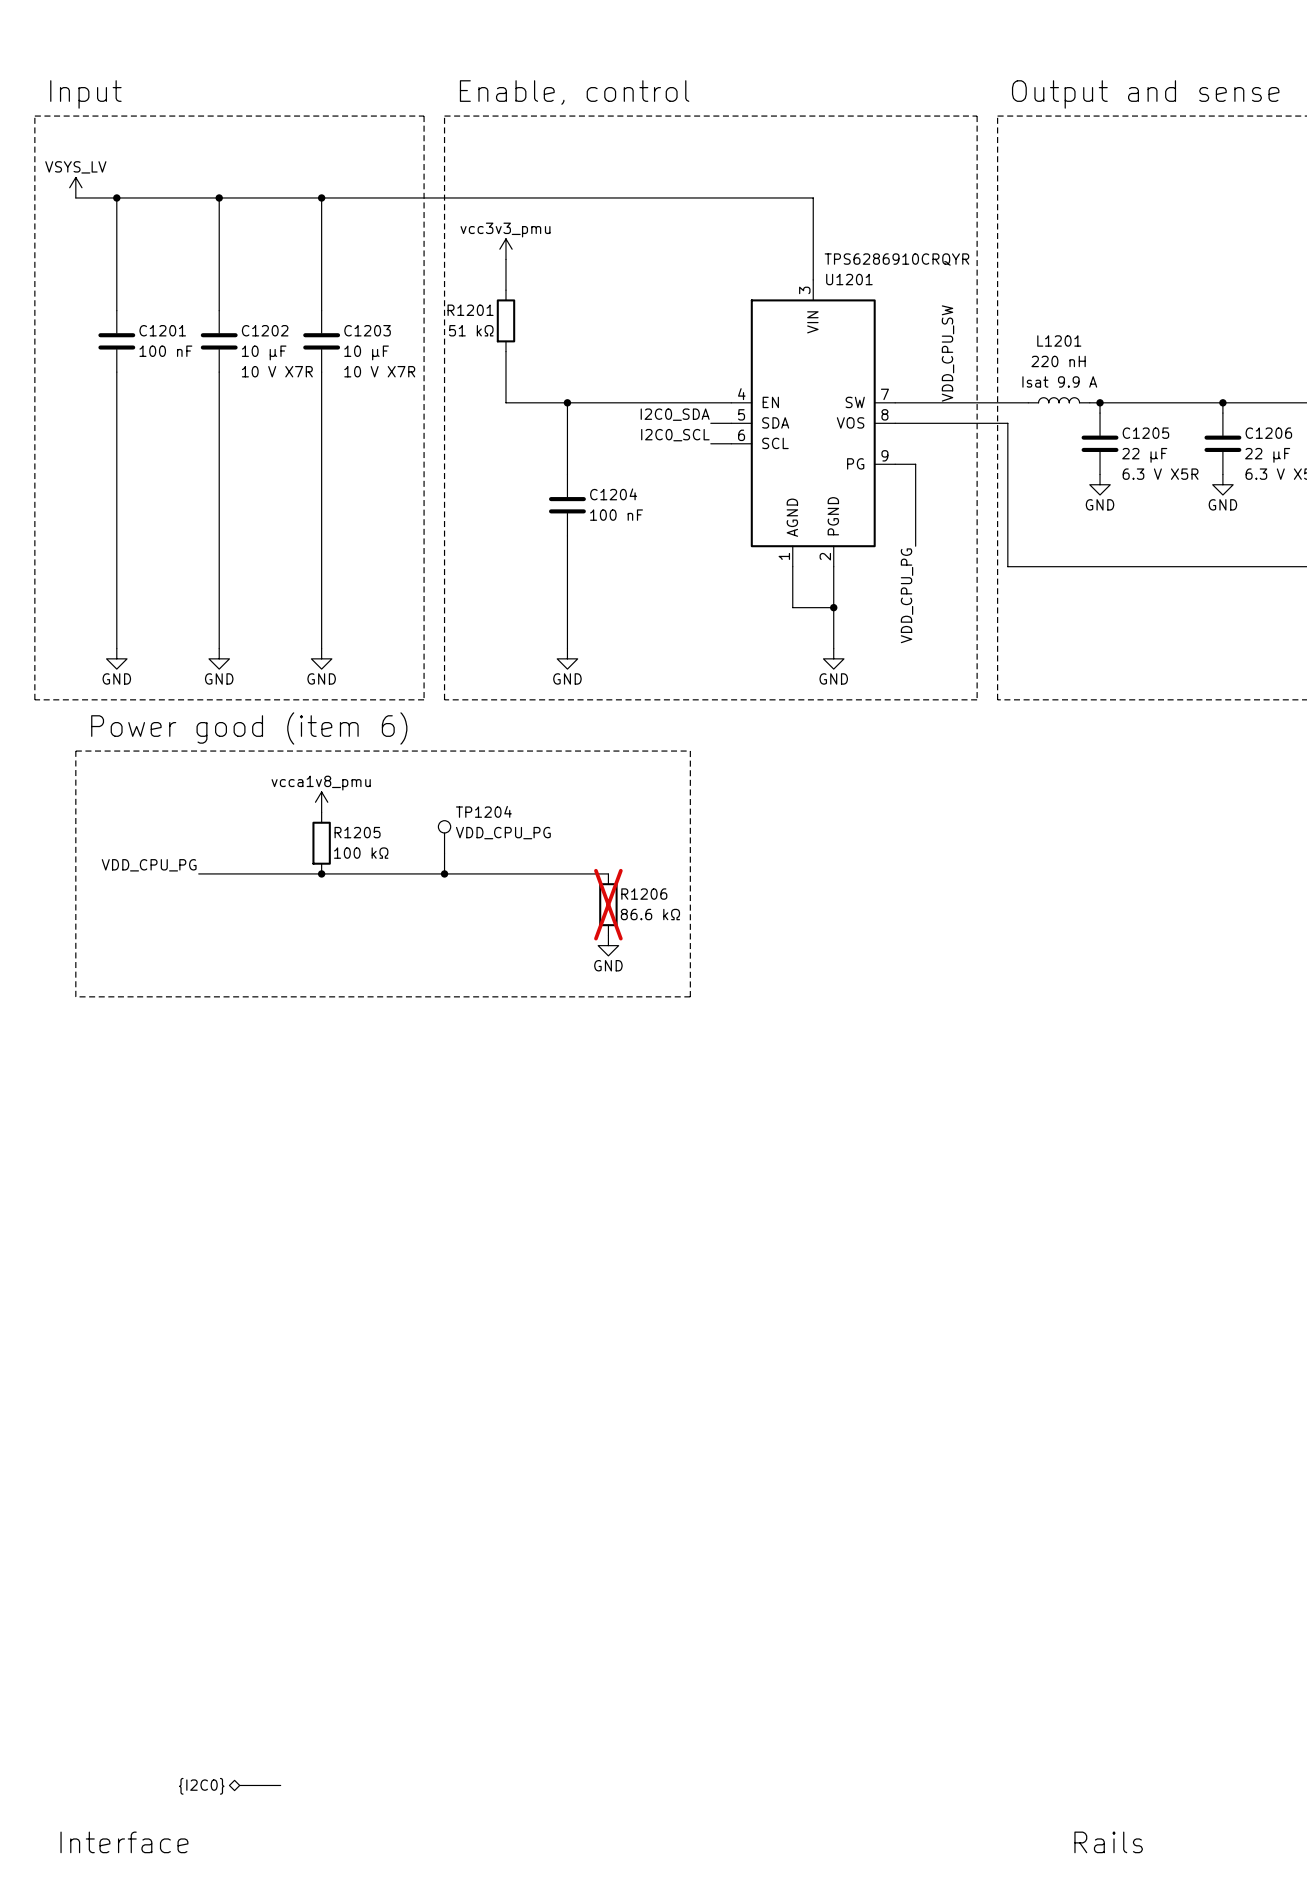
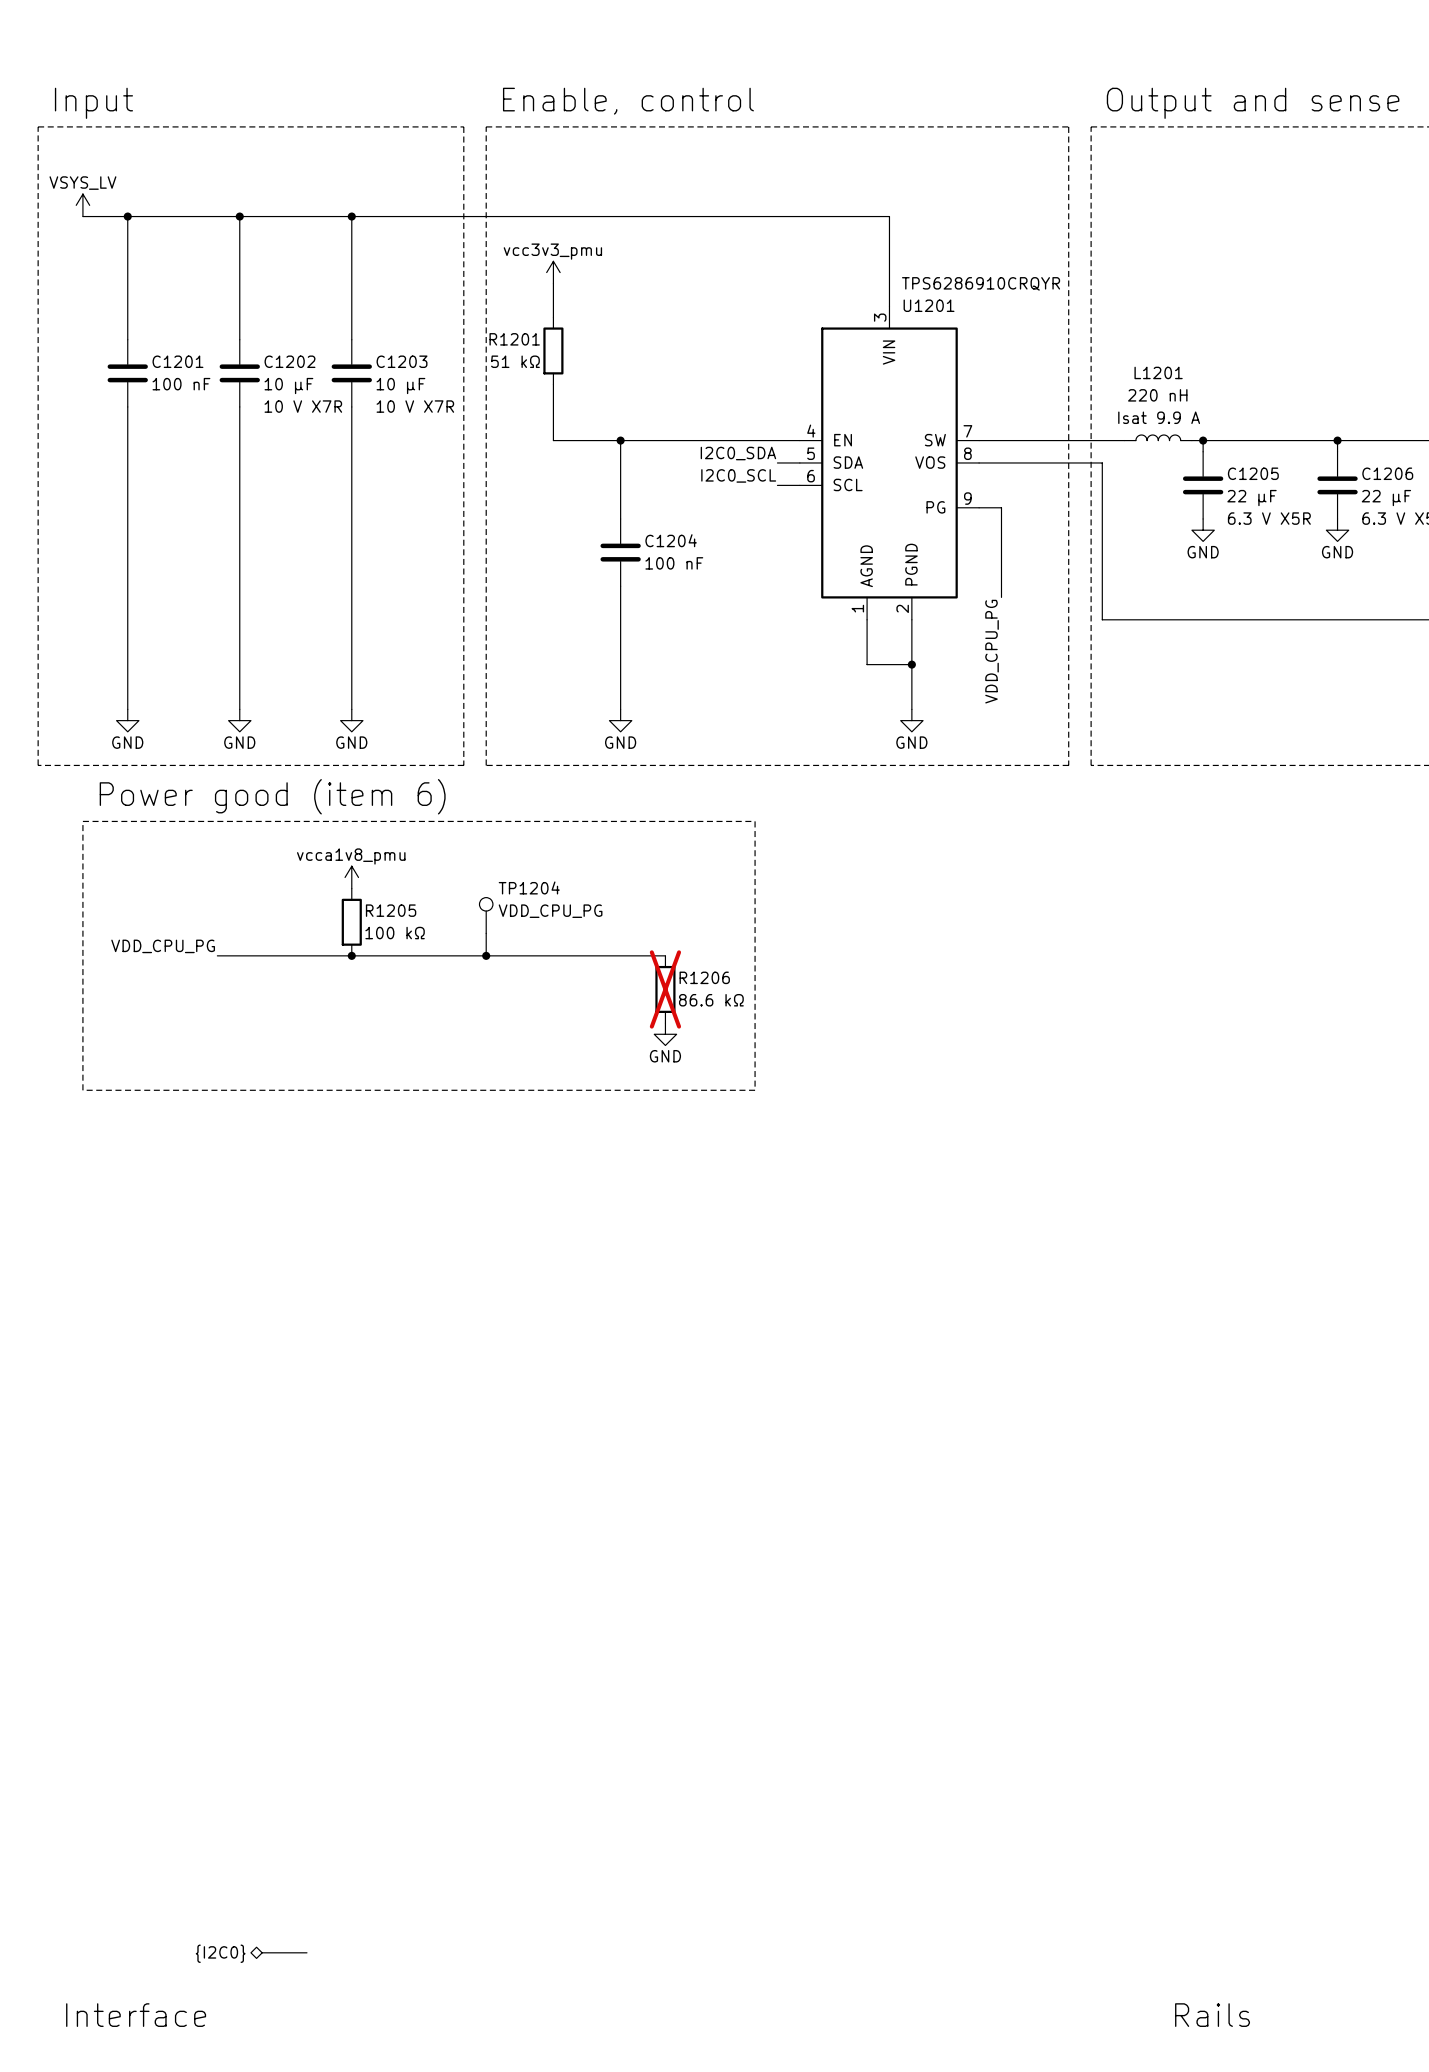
label: VDD_CPU_SW (947, 353) -> none

